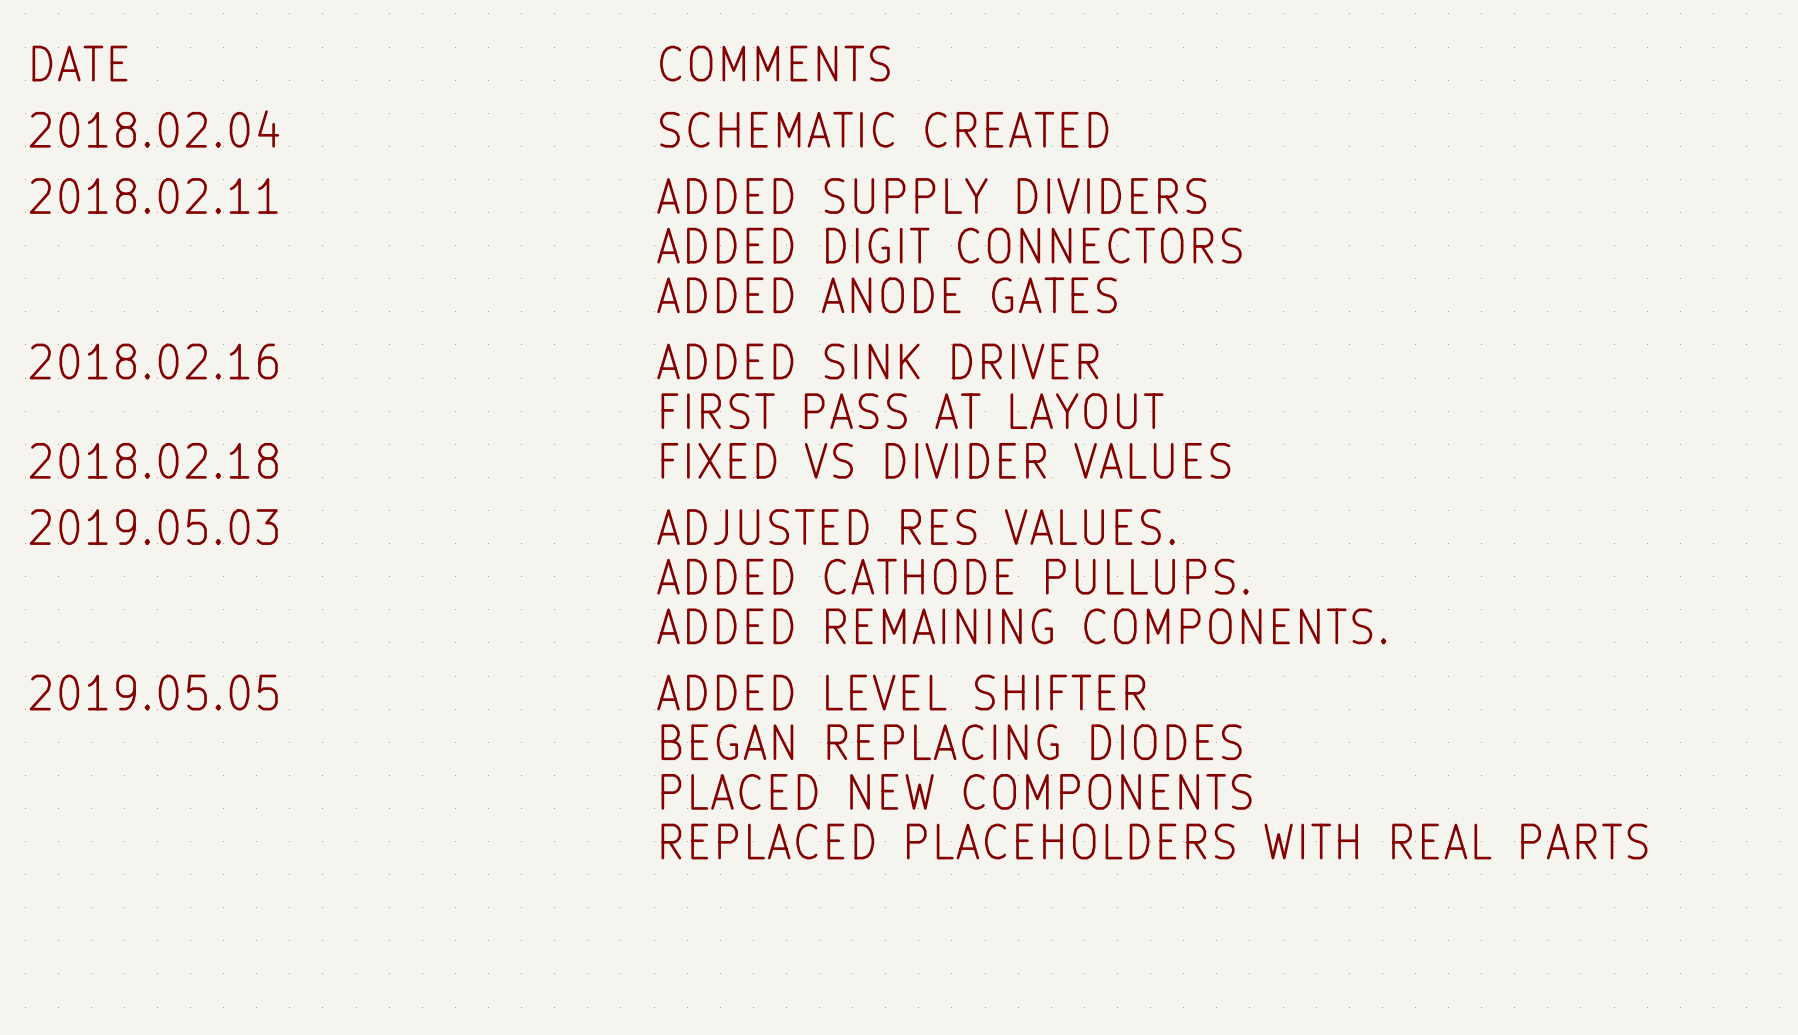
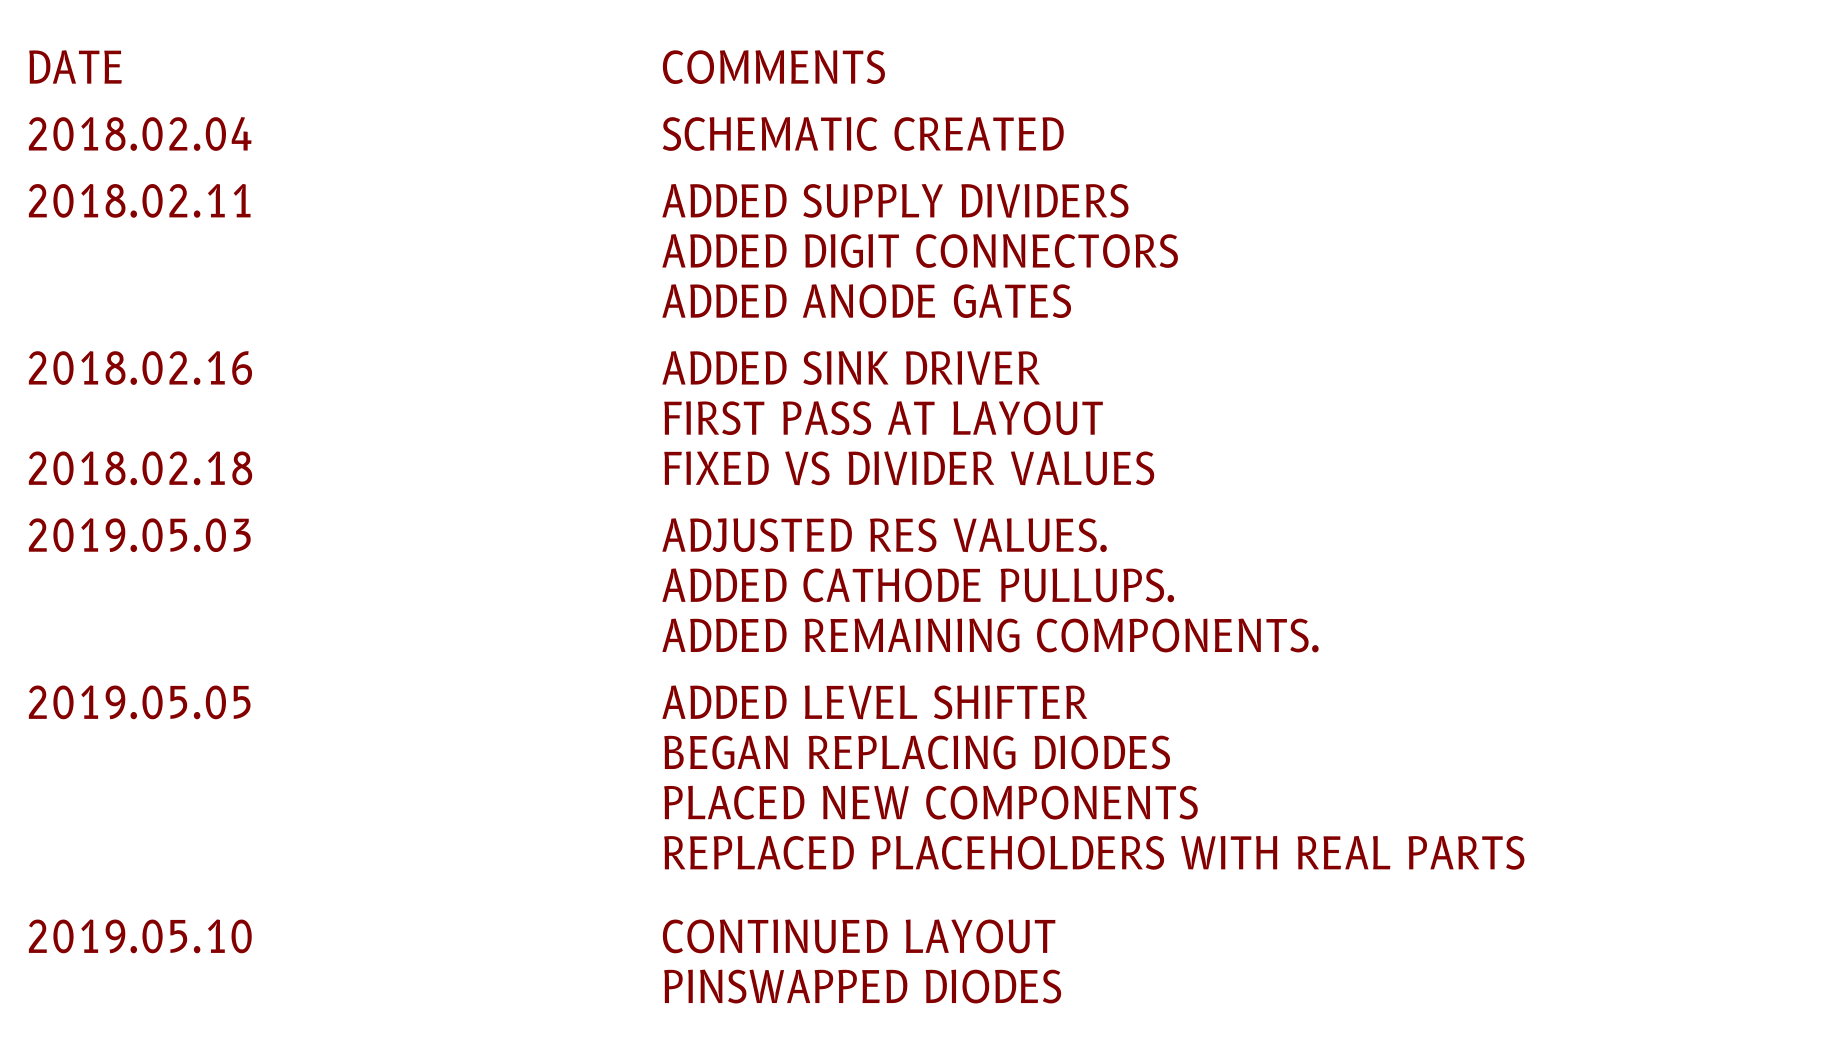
text: none -> 2019.05.10 (140, 936)
text: none -> CONTINUED LAYOUT (859, 936)
text: none -> PINSWAPPED DIODES (862, 986)

